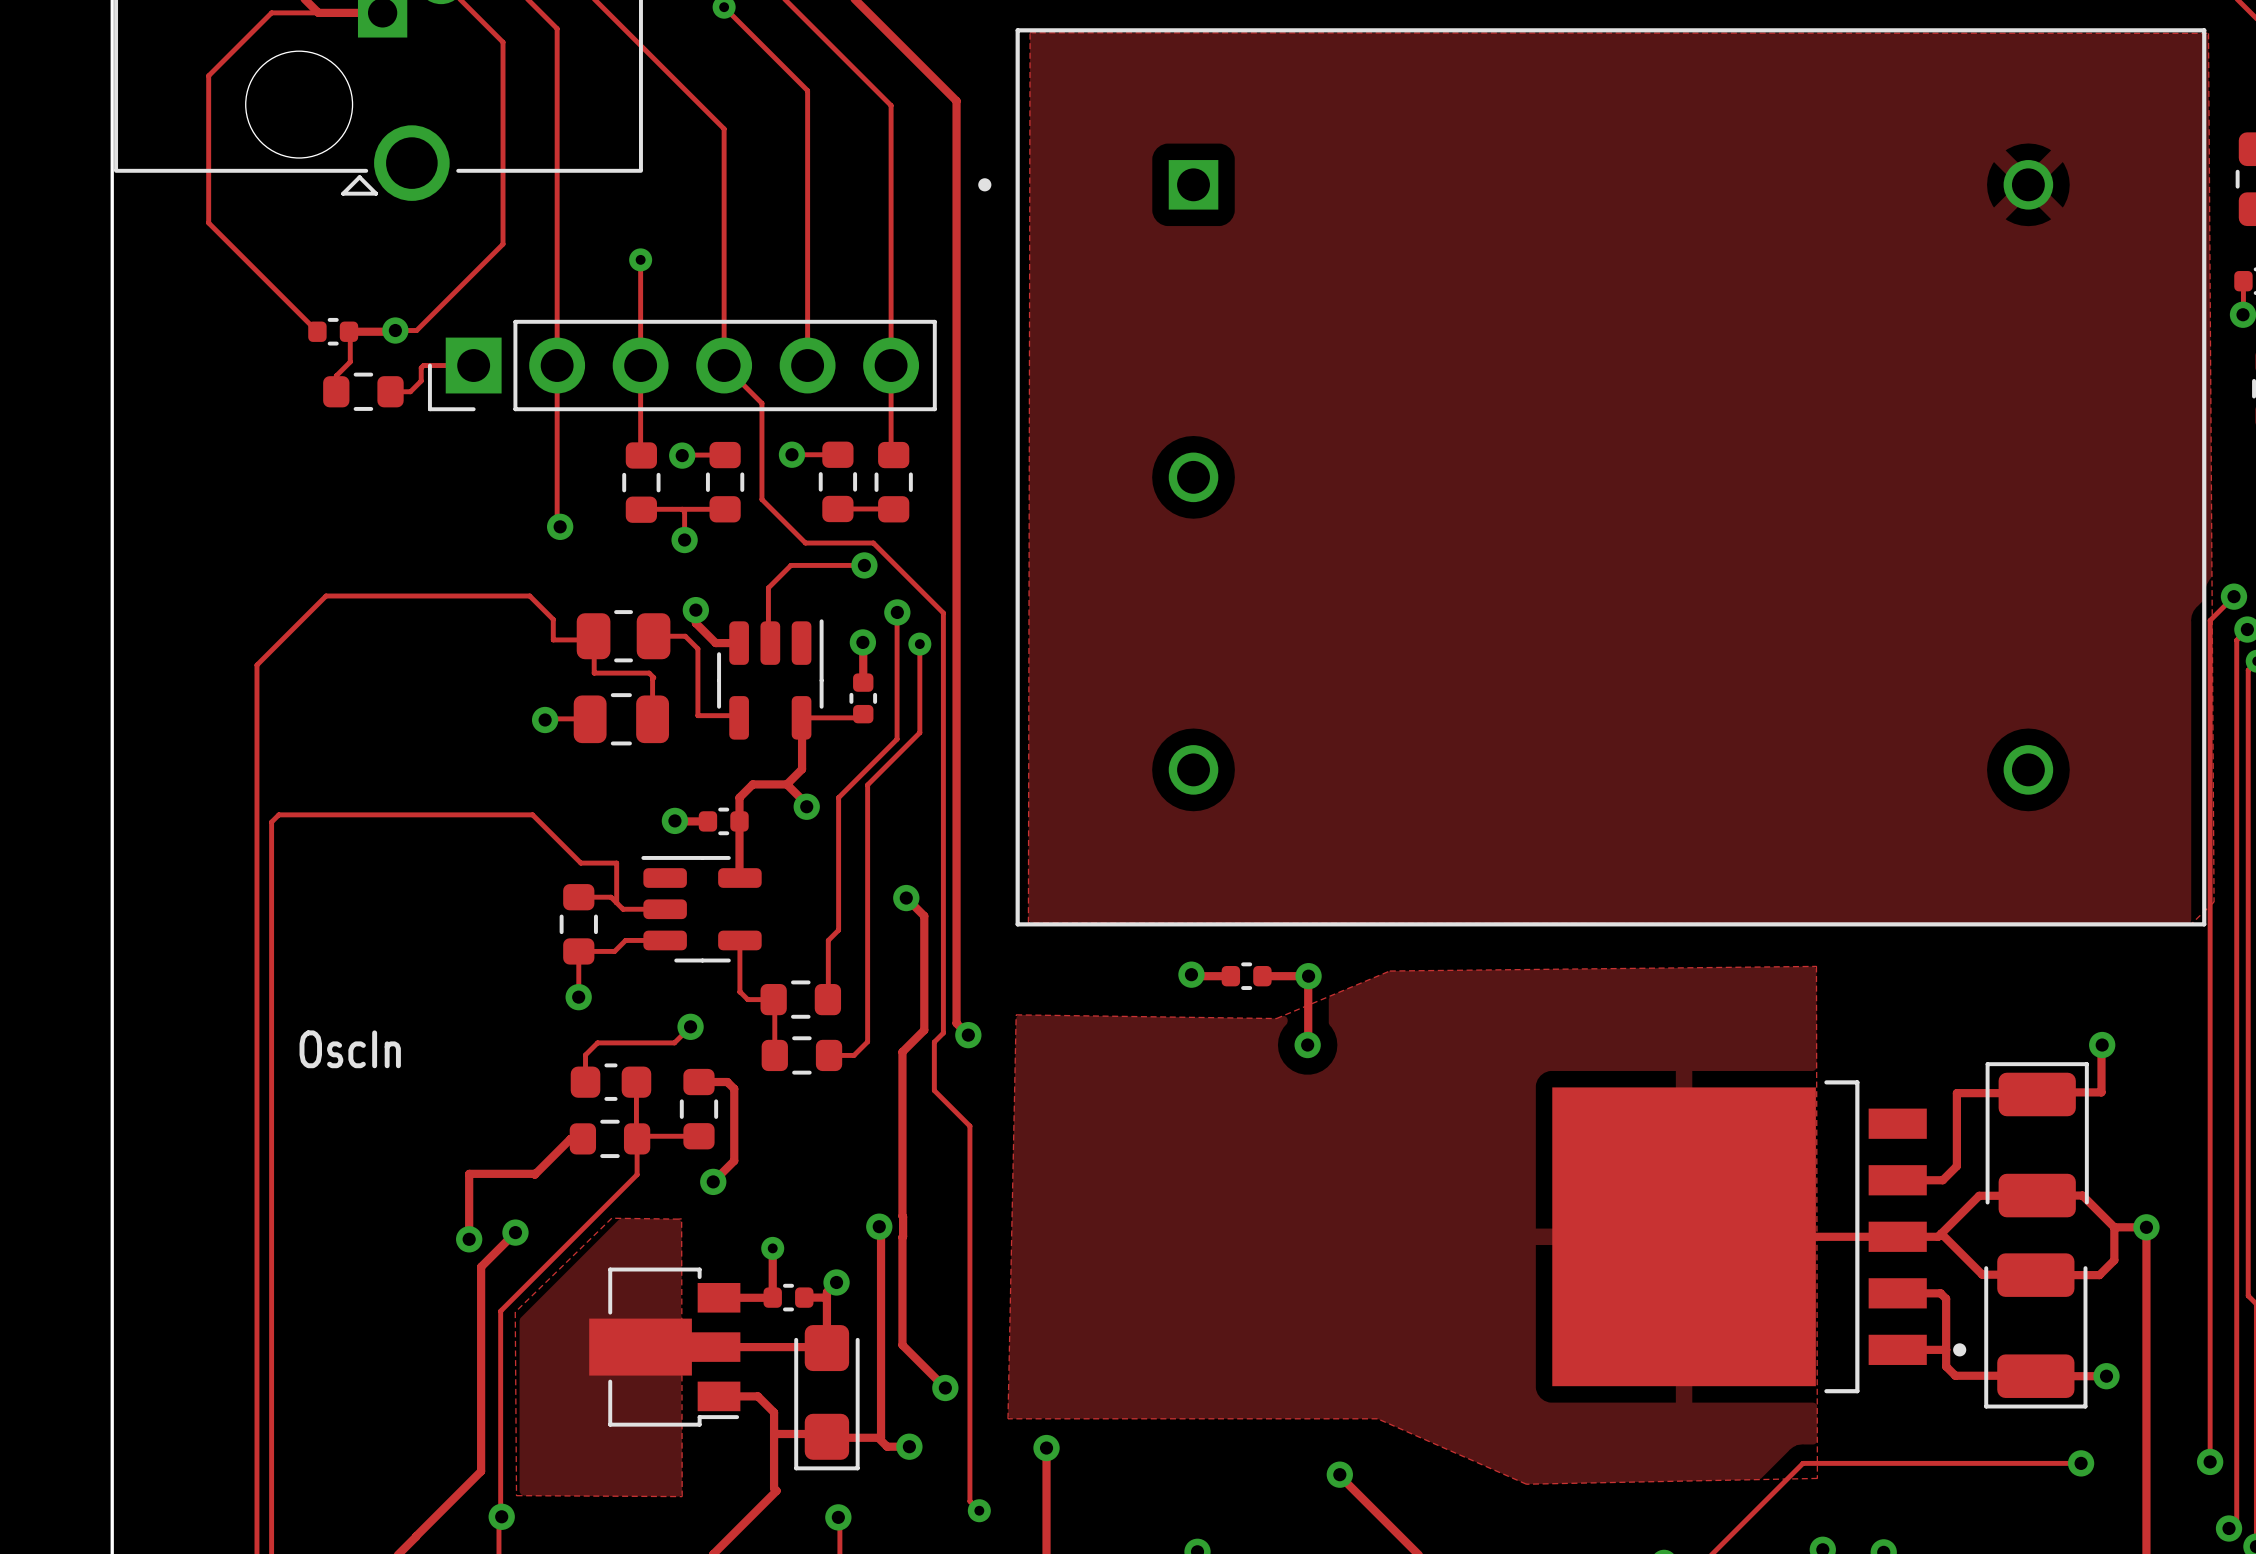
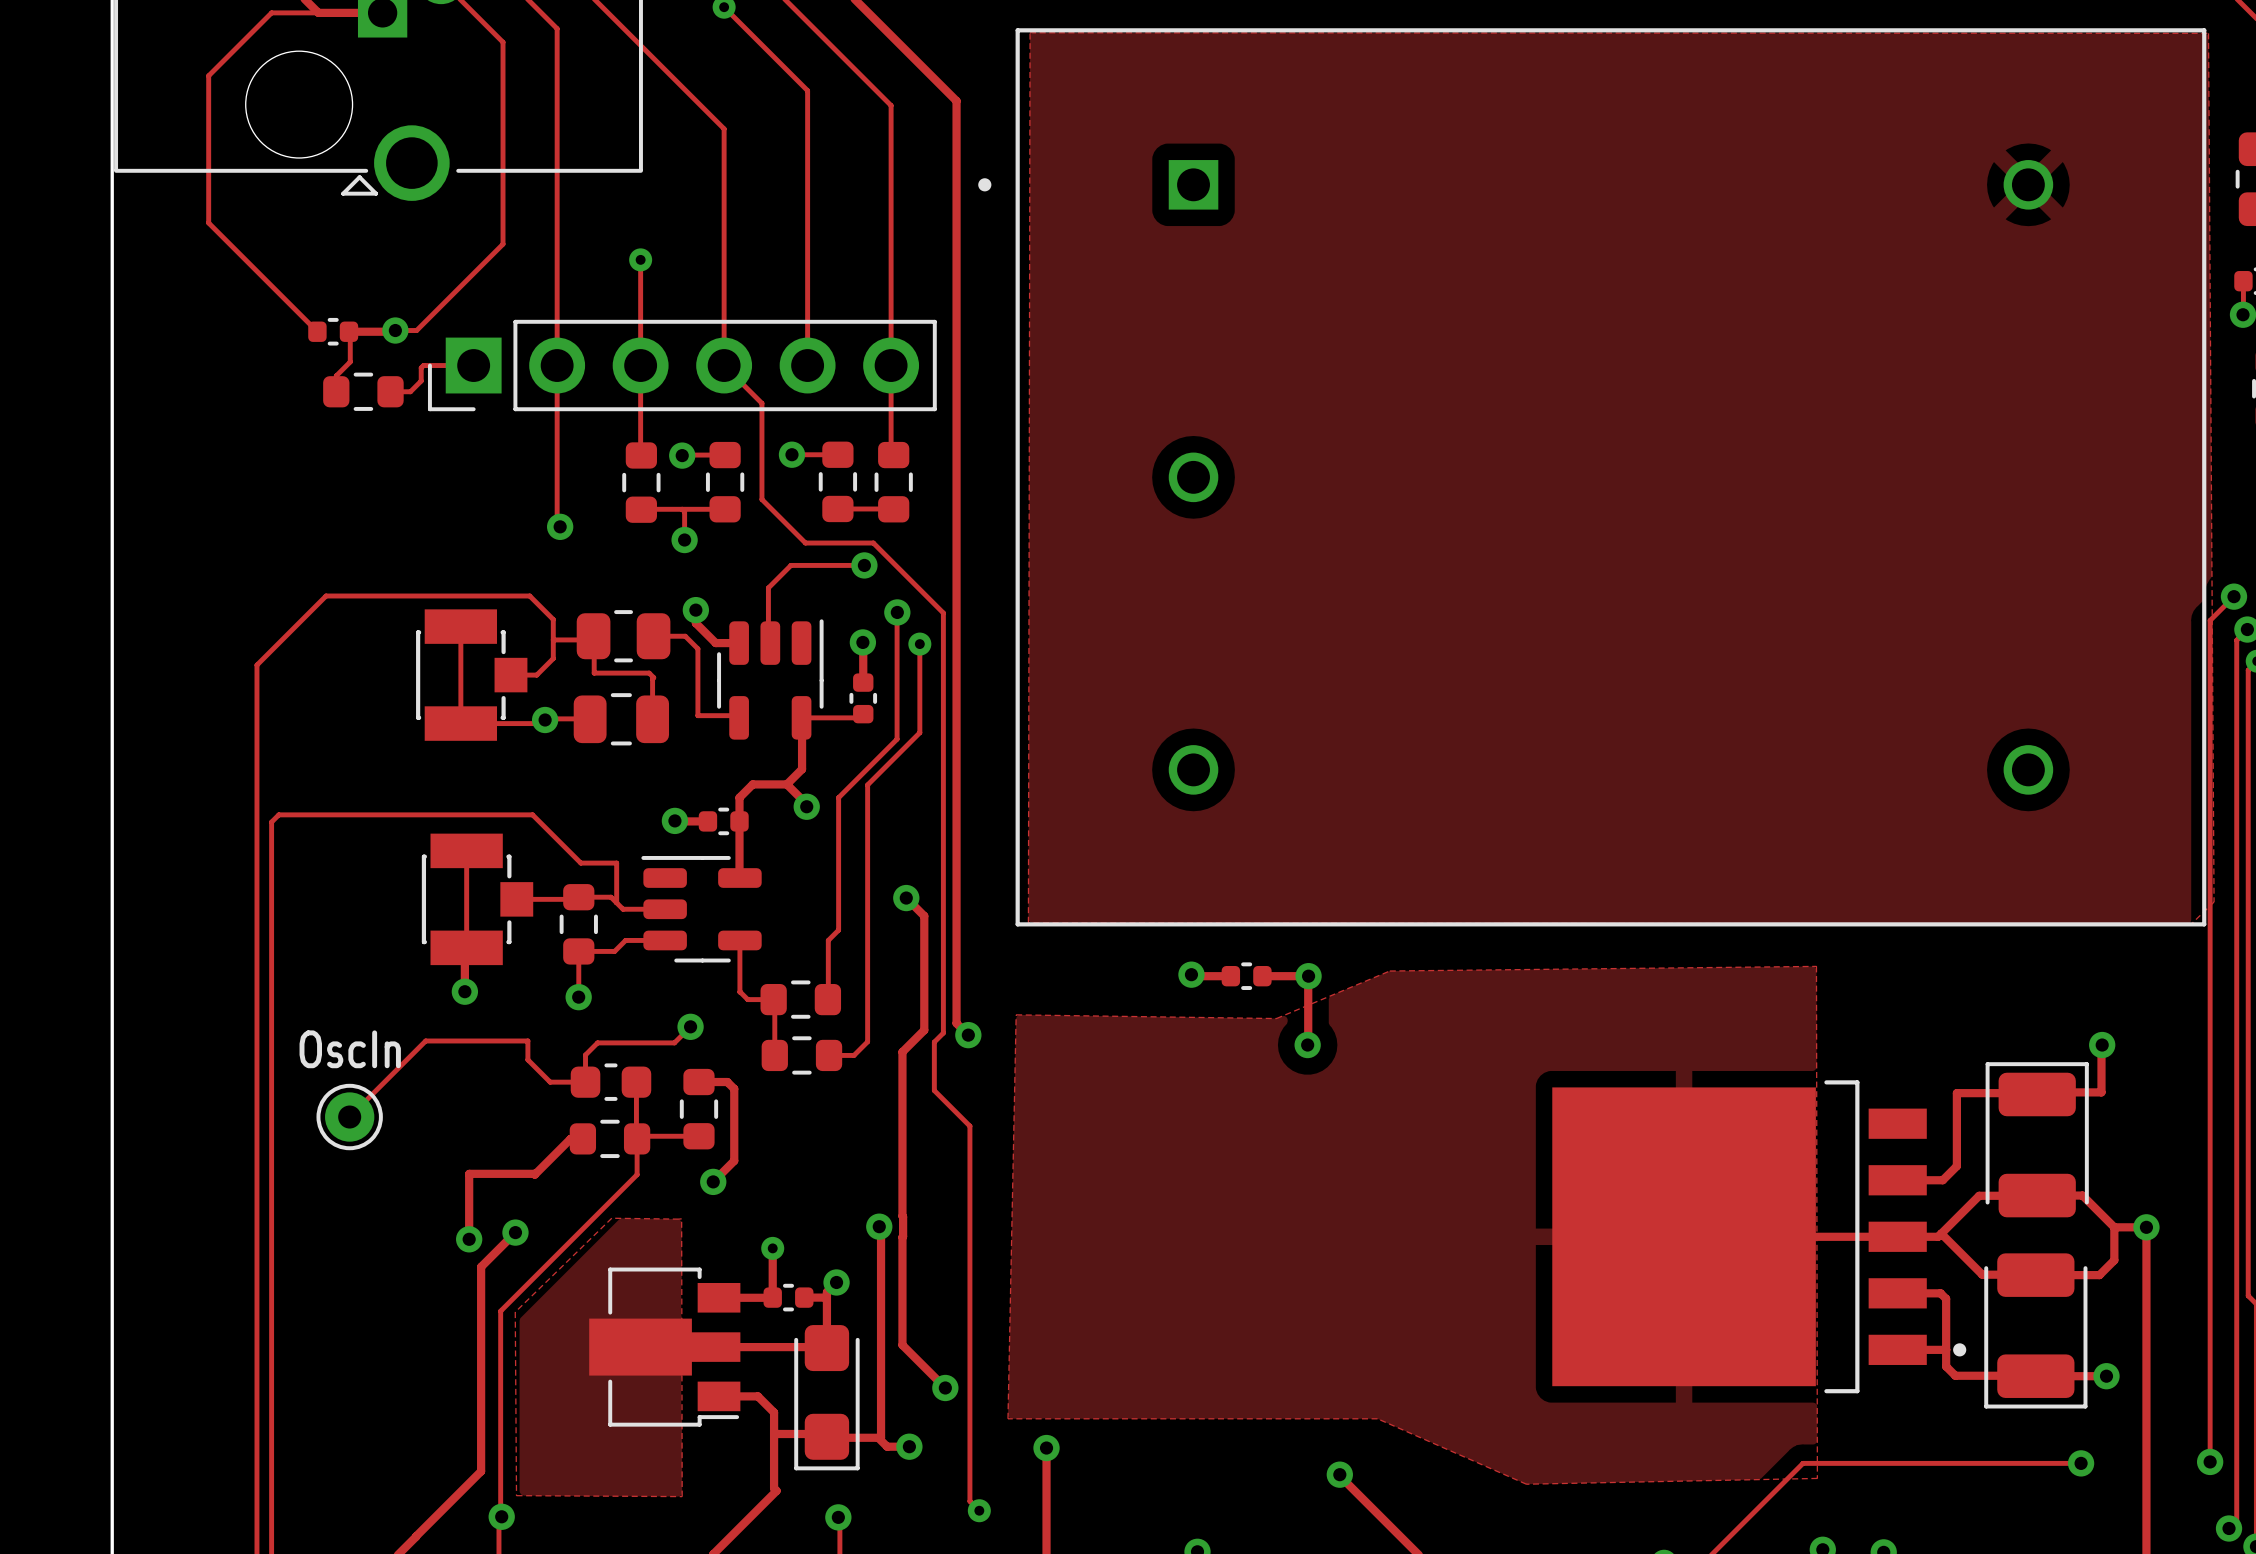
track: none -> (460, 626) (460, 723) (541, 723) (545, 719)
track: none -> (553, 639) (553, 658) (536, 675) (510, 675)
part: none -> (471, 675)
track: none -> (466, 850) (464, 991)
track: none -> (578, 897) (576, 899) (516, 899)
part: none -> (477, 899)
via: none -> (464, 991)
track: none -> (585, 1082) (550, 1082) (527, 1059) (527, 1040) (425, 1040) (349, 1117)
part: none -> (349, 1117)

